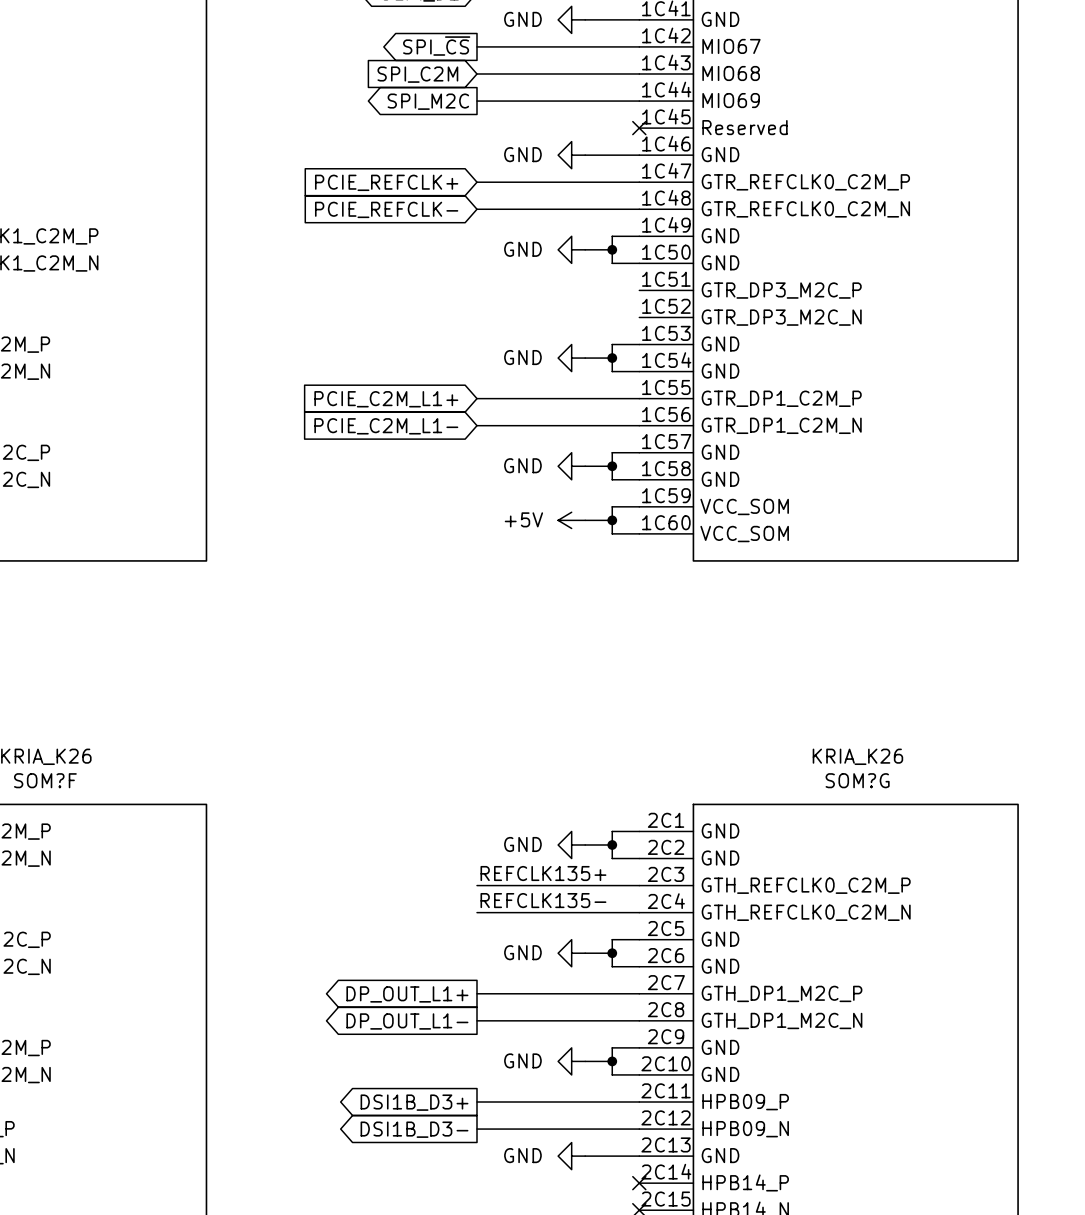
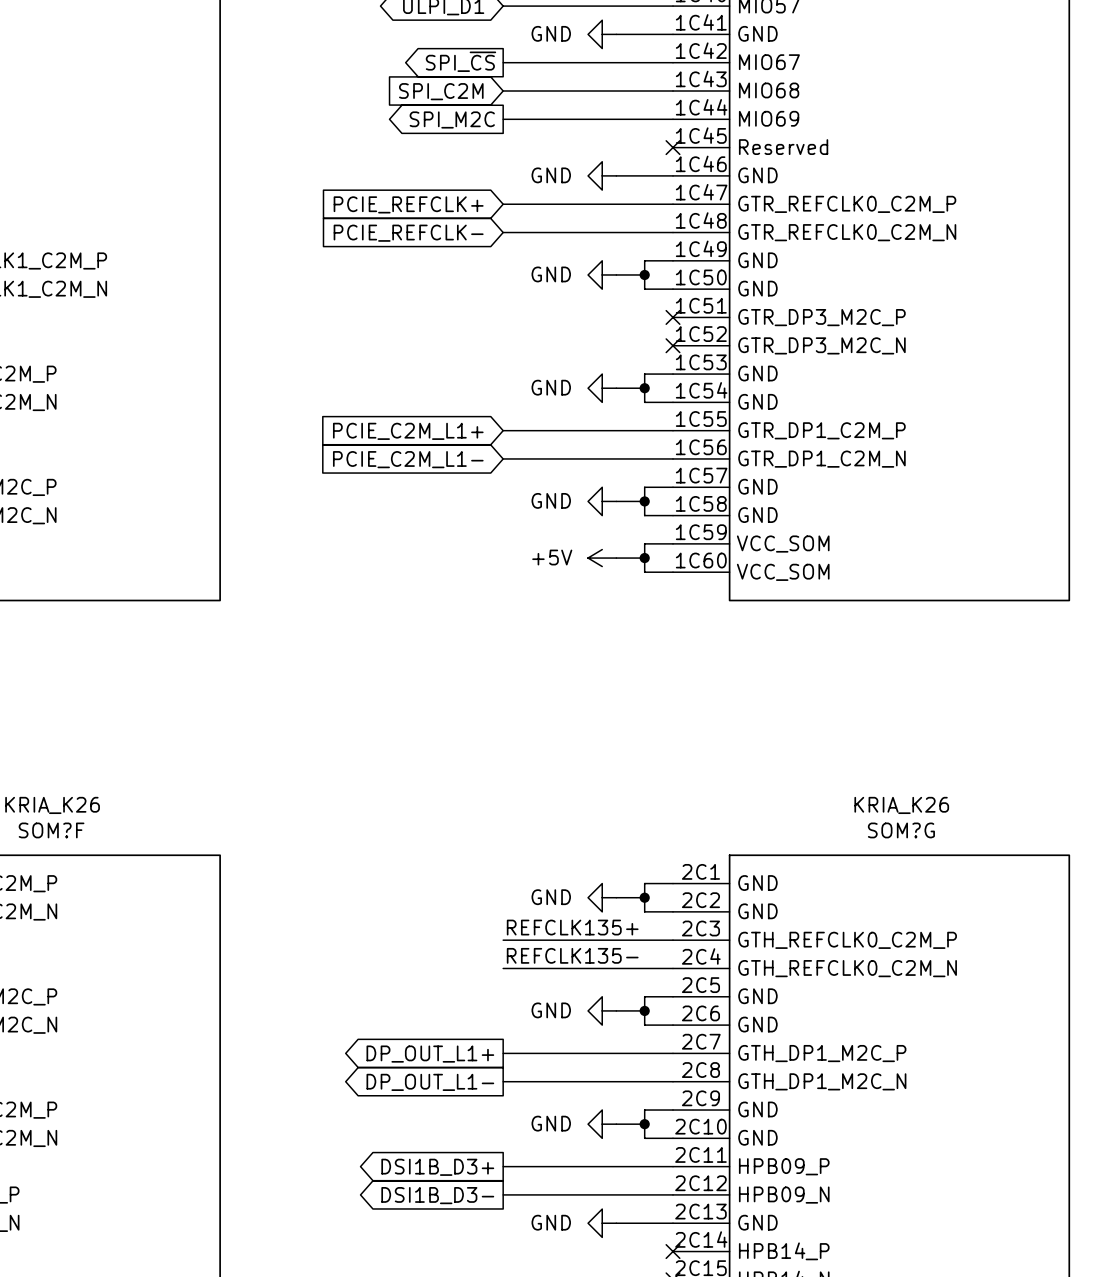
no-connect mark: none -> (673, 317)
no-connect mark: none -> (673, 345)

